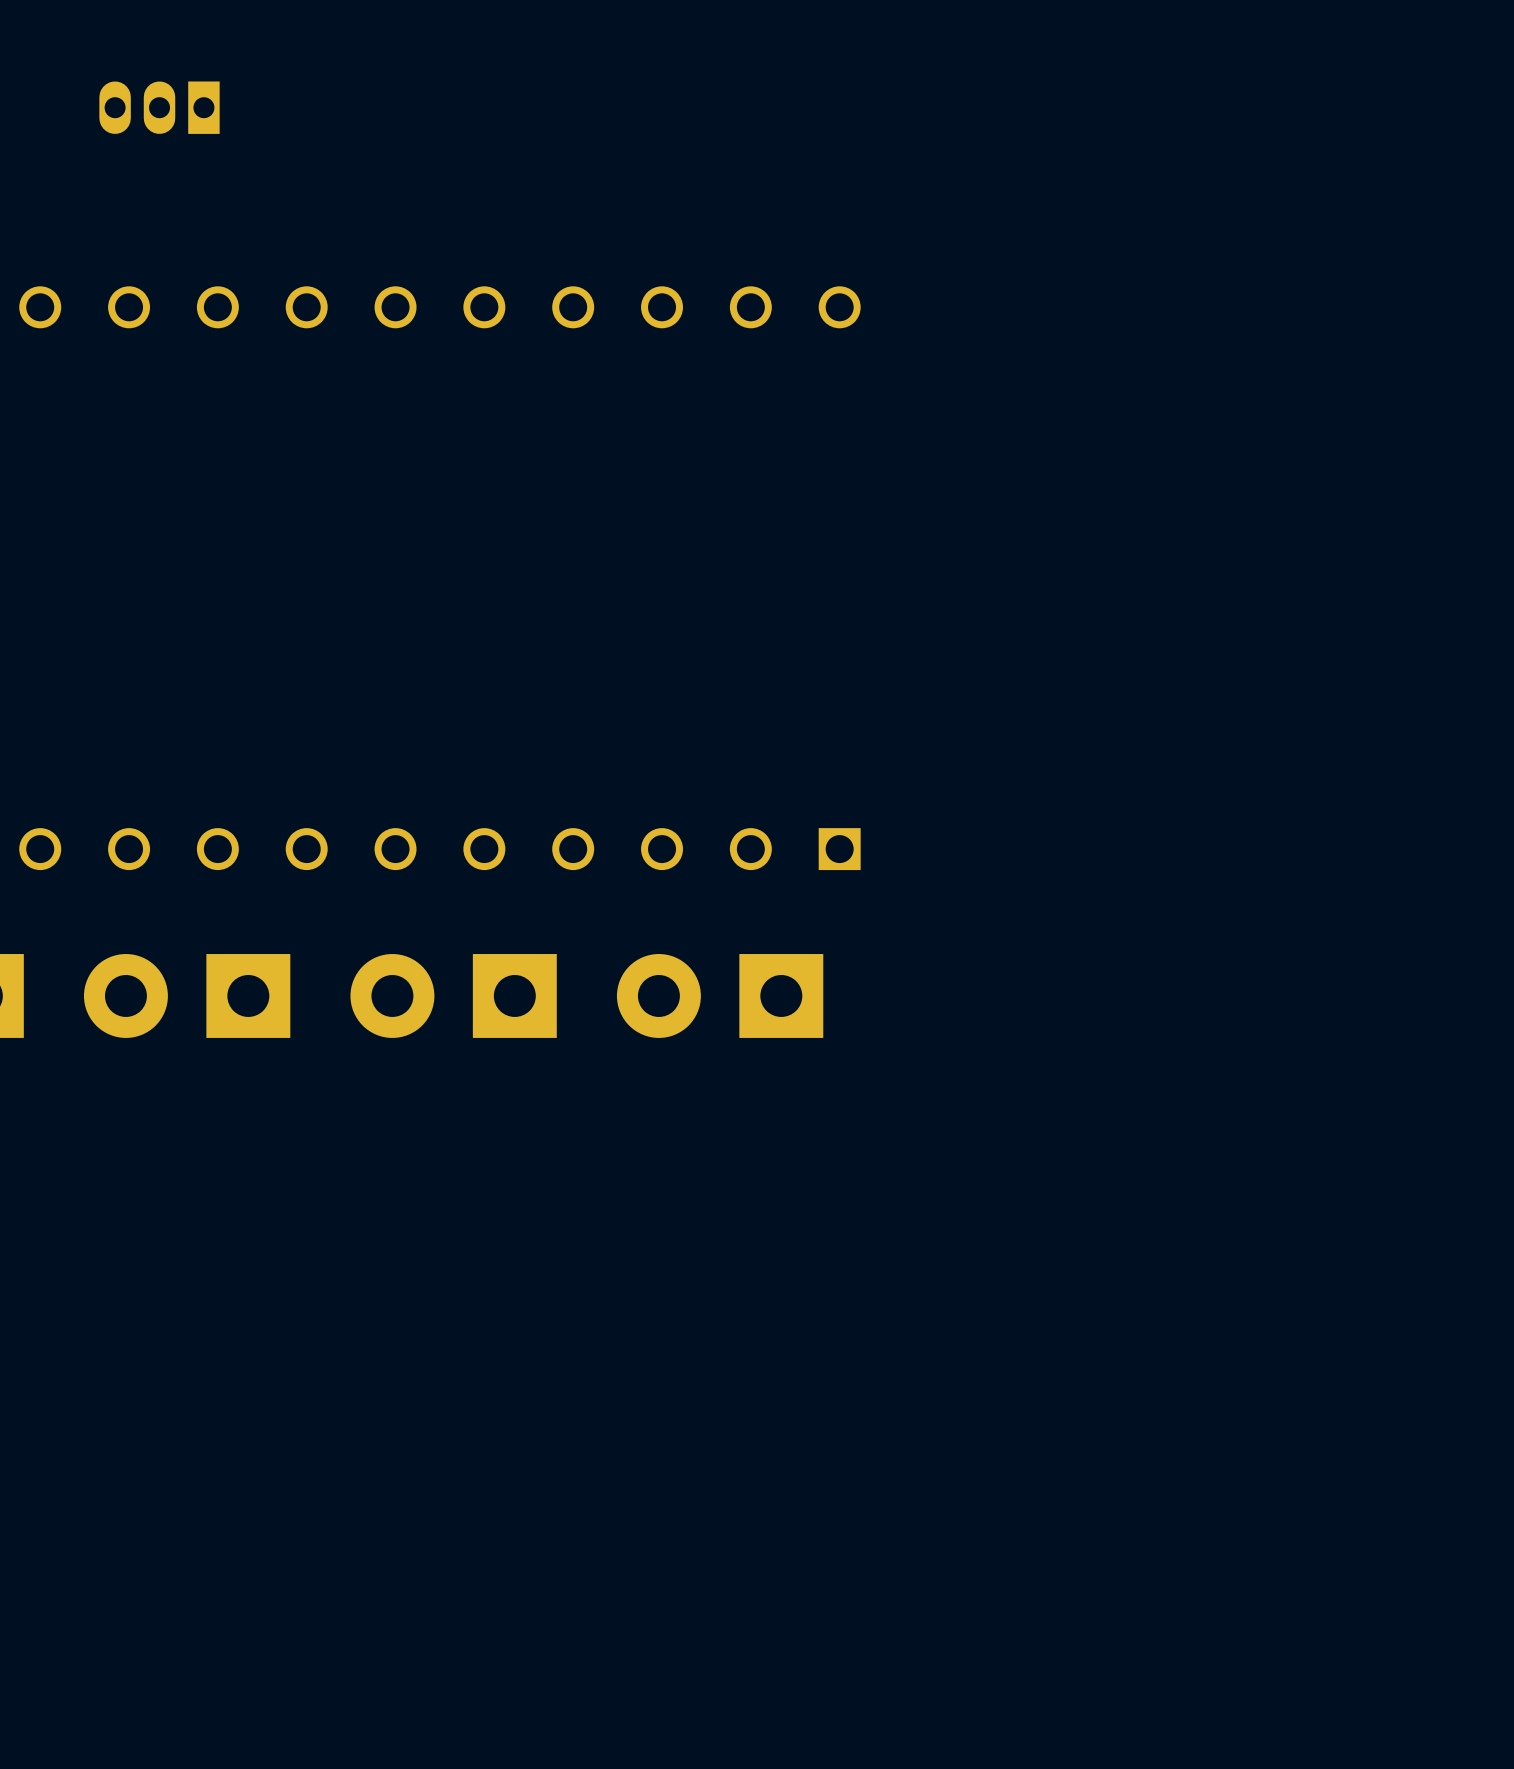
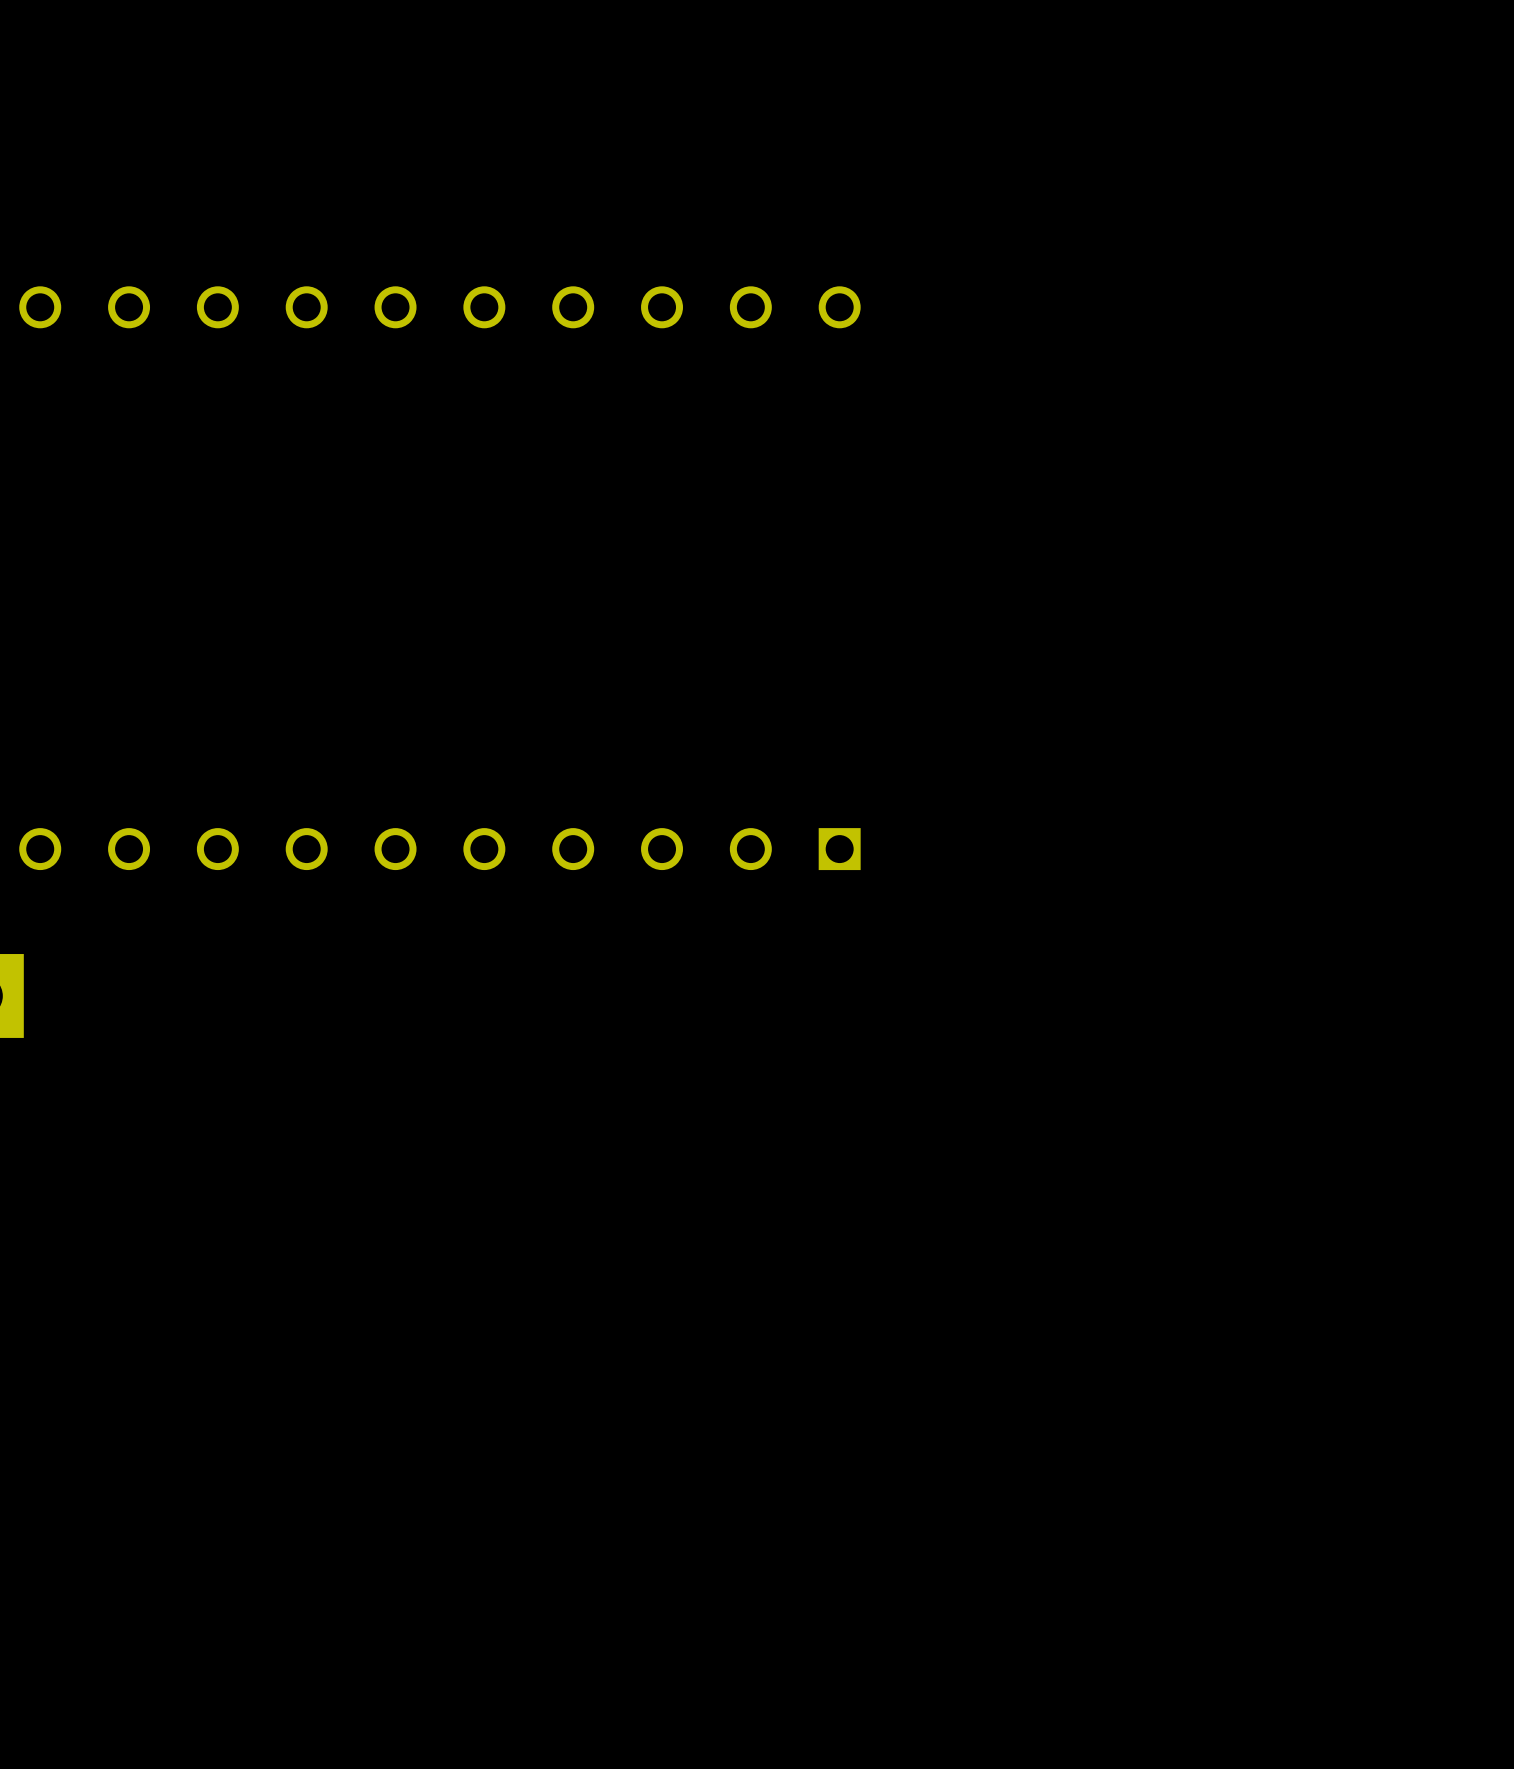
part: (159, 107) -> none
part: (187, 995) -> none
part: (453, 995) -> none
part: (720, 995) -> none

